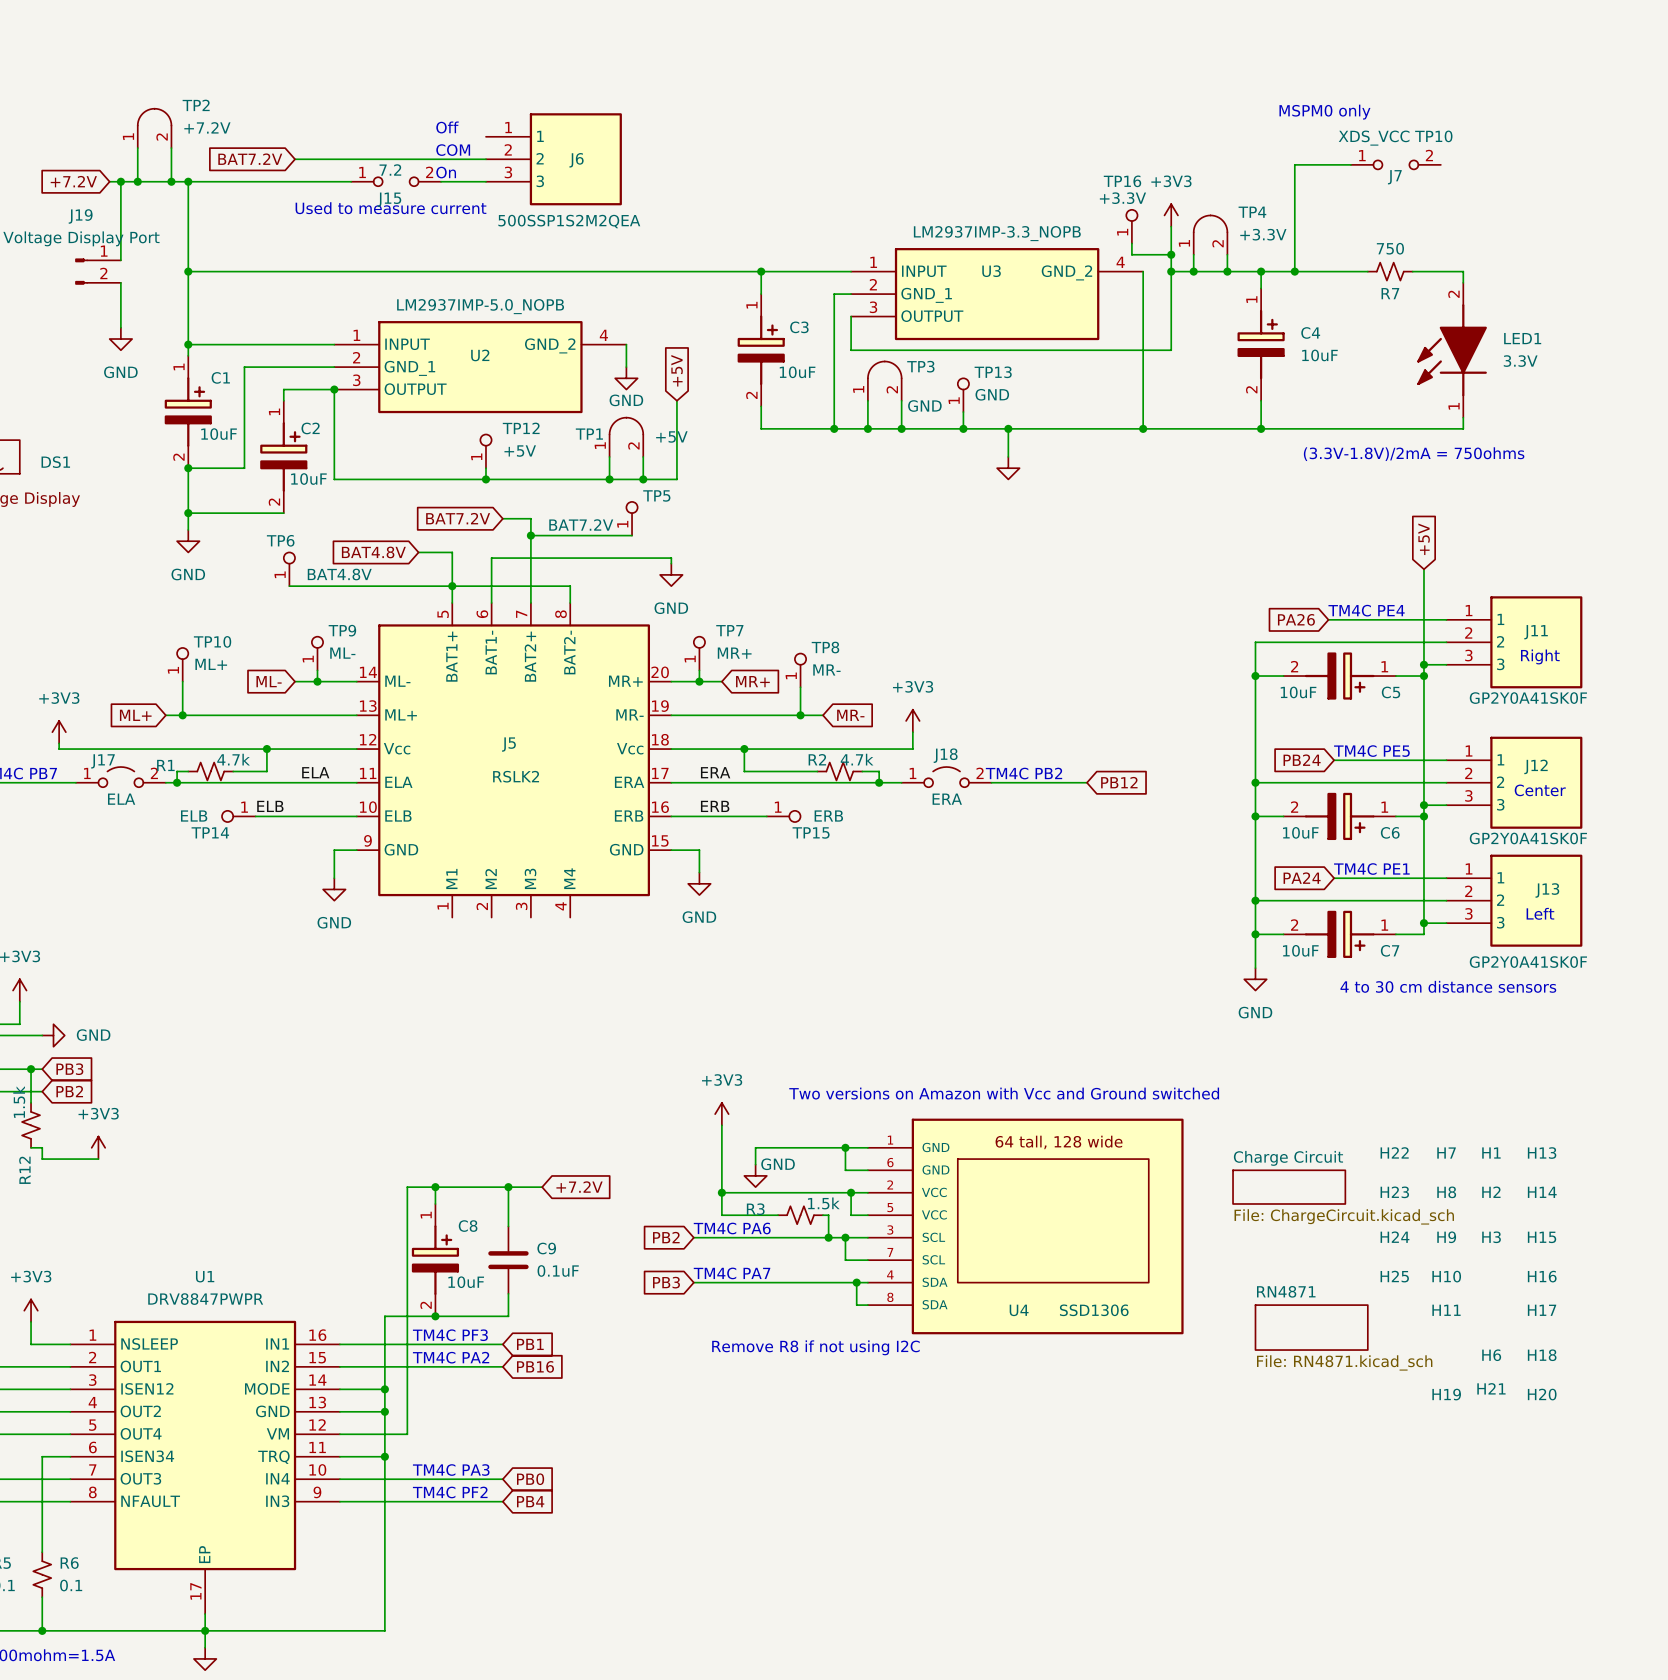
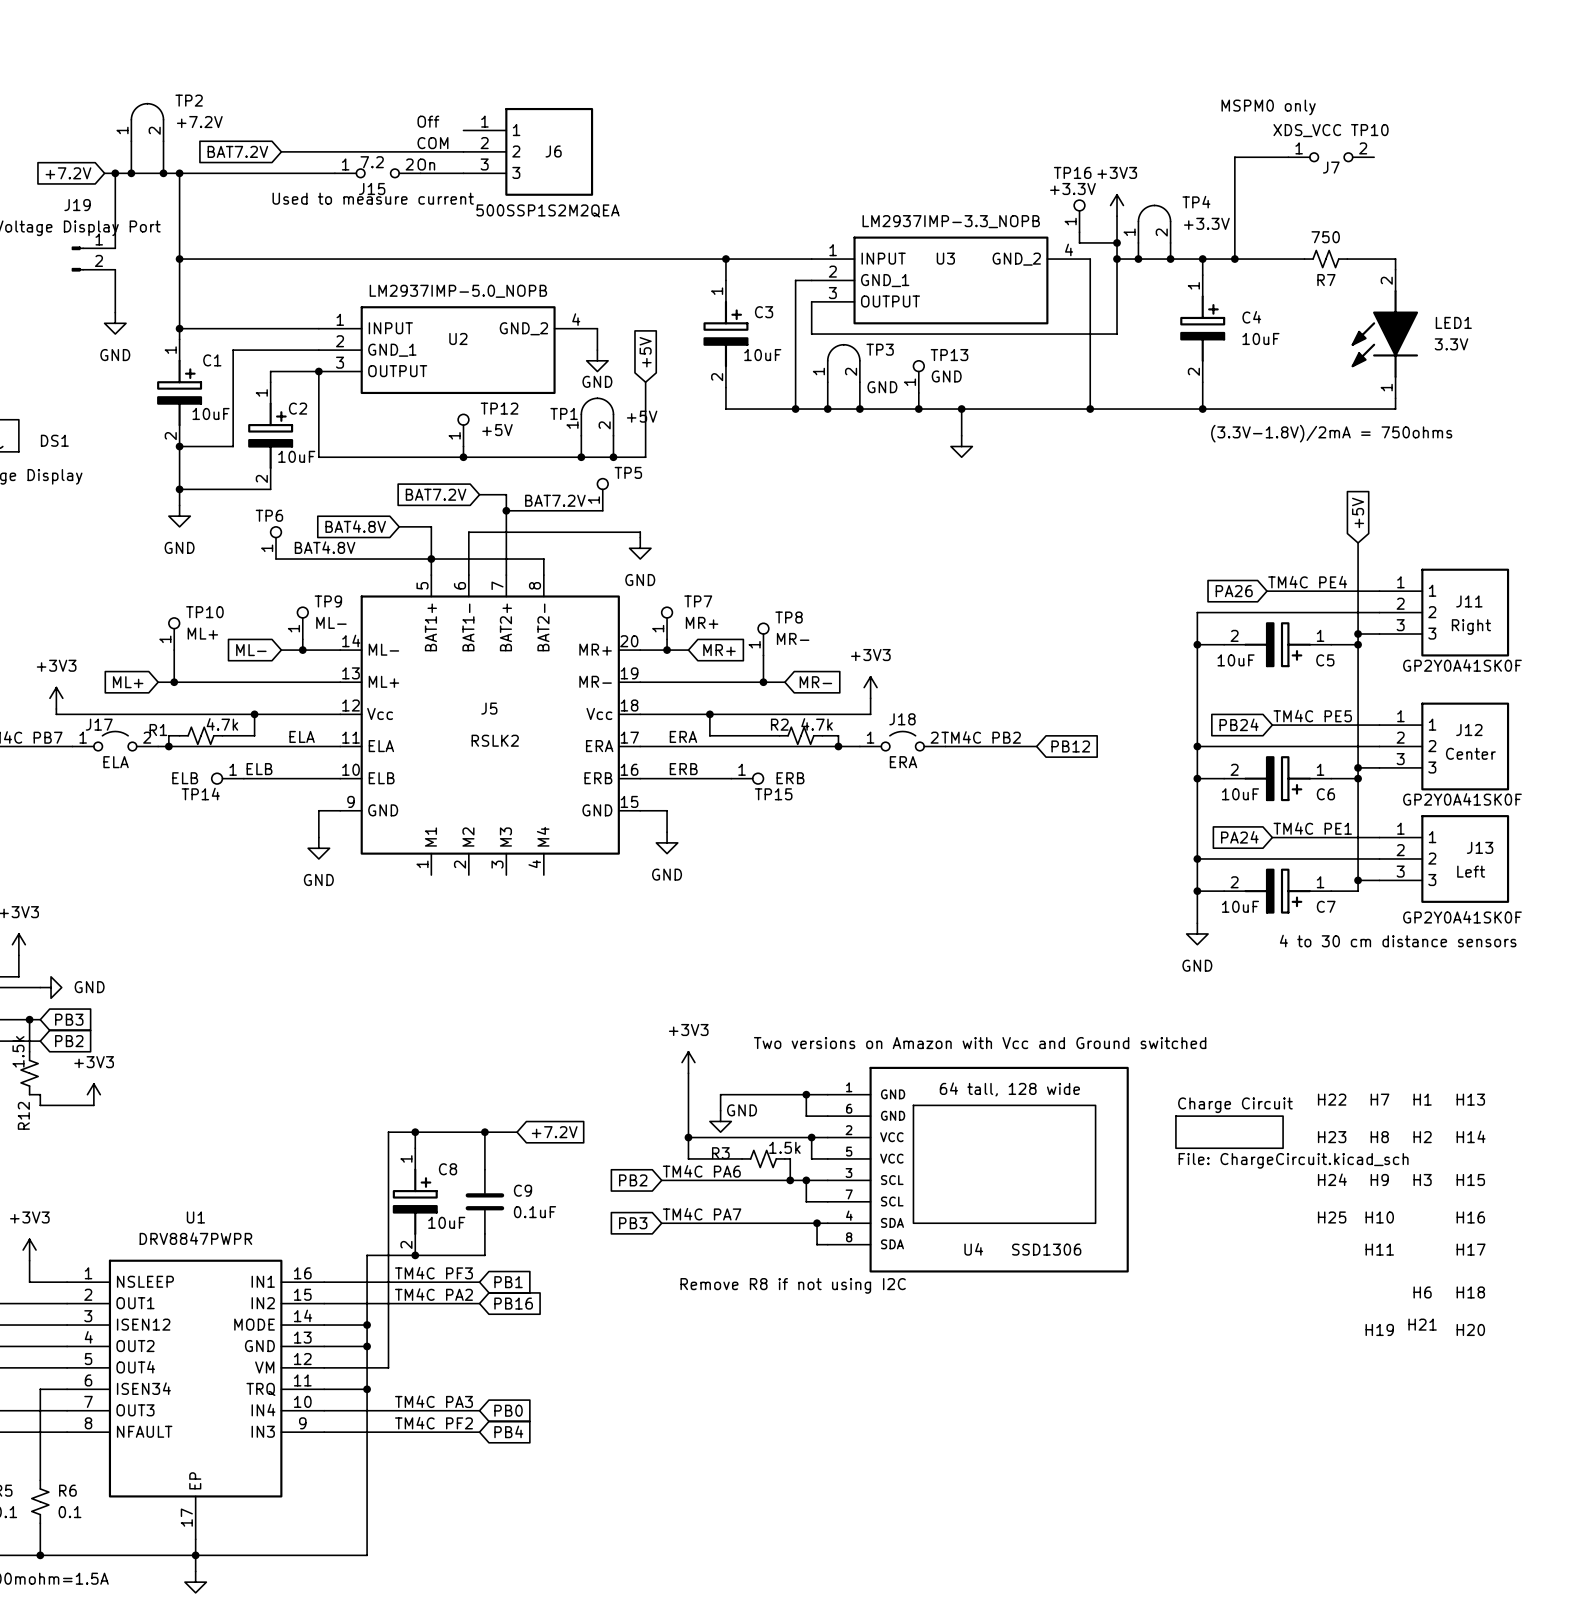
sheet RN4871: File: RN4871.kicad_sch (1311, 1327) -> none

